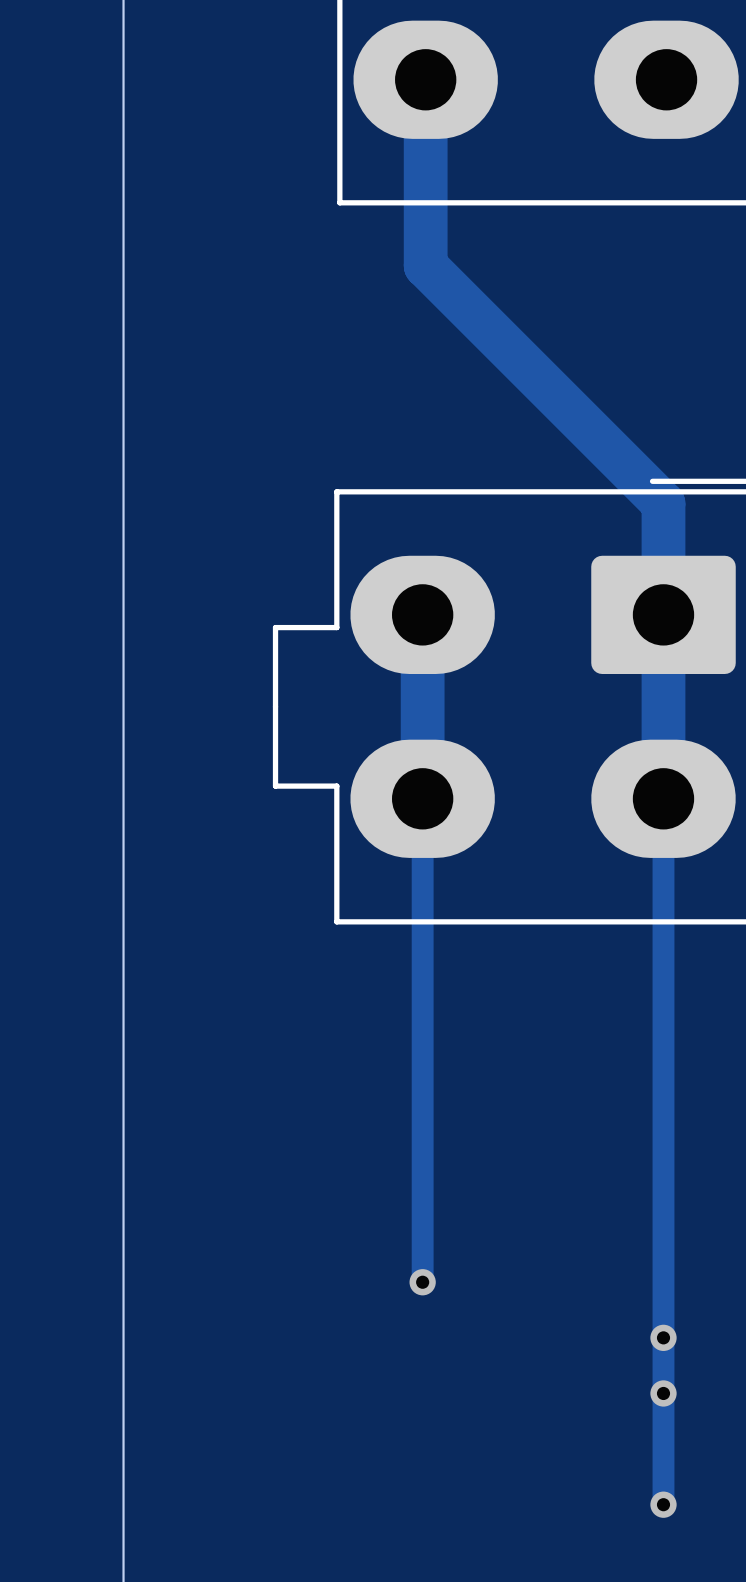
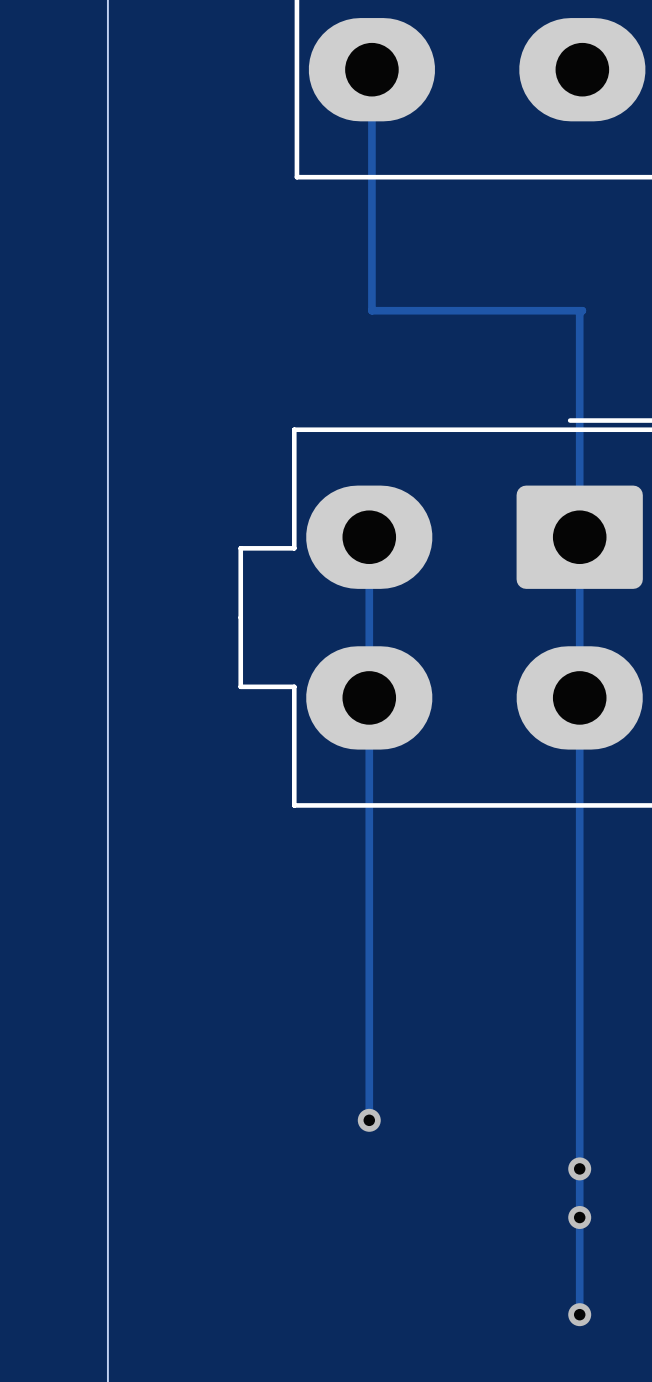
track width: thick (425, 79) (425, 265) -> thin (371, 69) (371, 232)
track: (425, 265) (663, 503) -> (371, 232) (371, 310) (582, 310) (579, 313) (579, 440)
track width: thick (663, 503) (663, 1504) -> thin (579, 440) (579, 1314)
track width: thick (422, 614) (422, 1282) -> thin (369, 537) (369, 1120)

